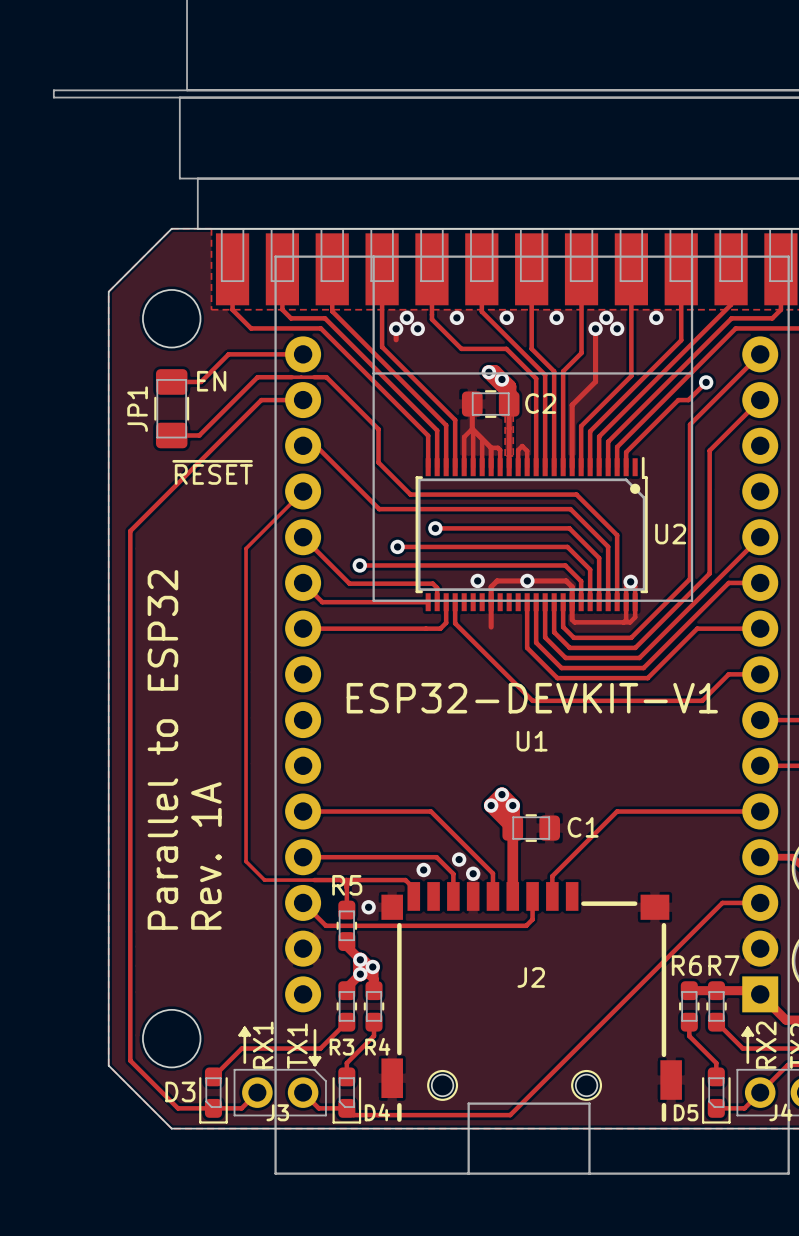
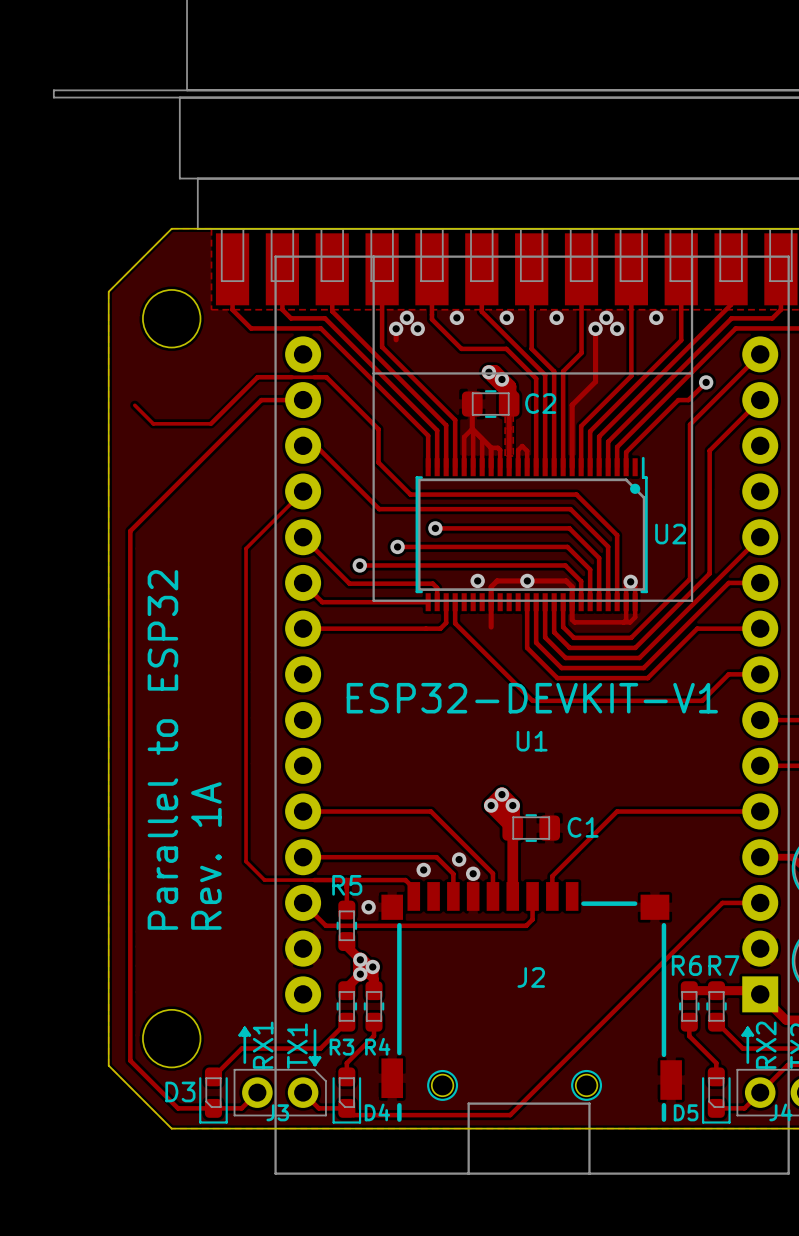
track: (303, 354) (228, 354) (201, 381) (171, 381) -> none
text: EN (211, 381) -> none
JP1: (171, 408) -> none
track: (210, 423) (199, 435) (171, 435) -> (210, 423) (153, 423) (134, 405)
text: ~{RESET} (212, 472) -> none

